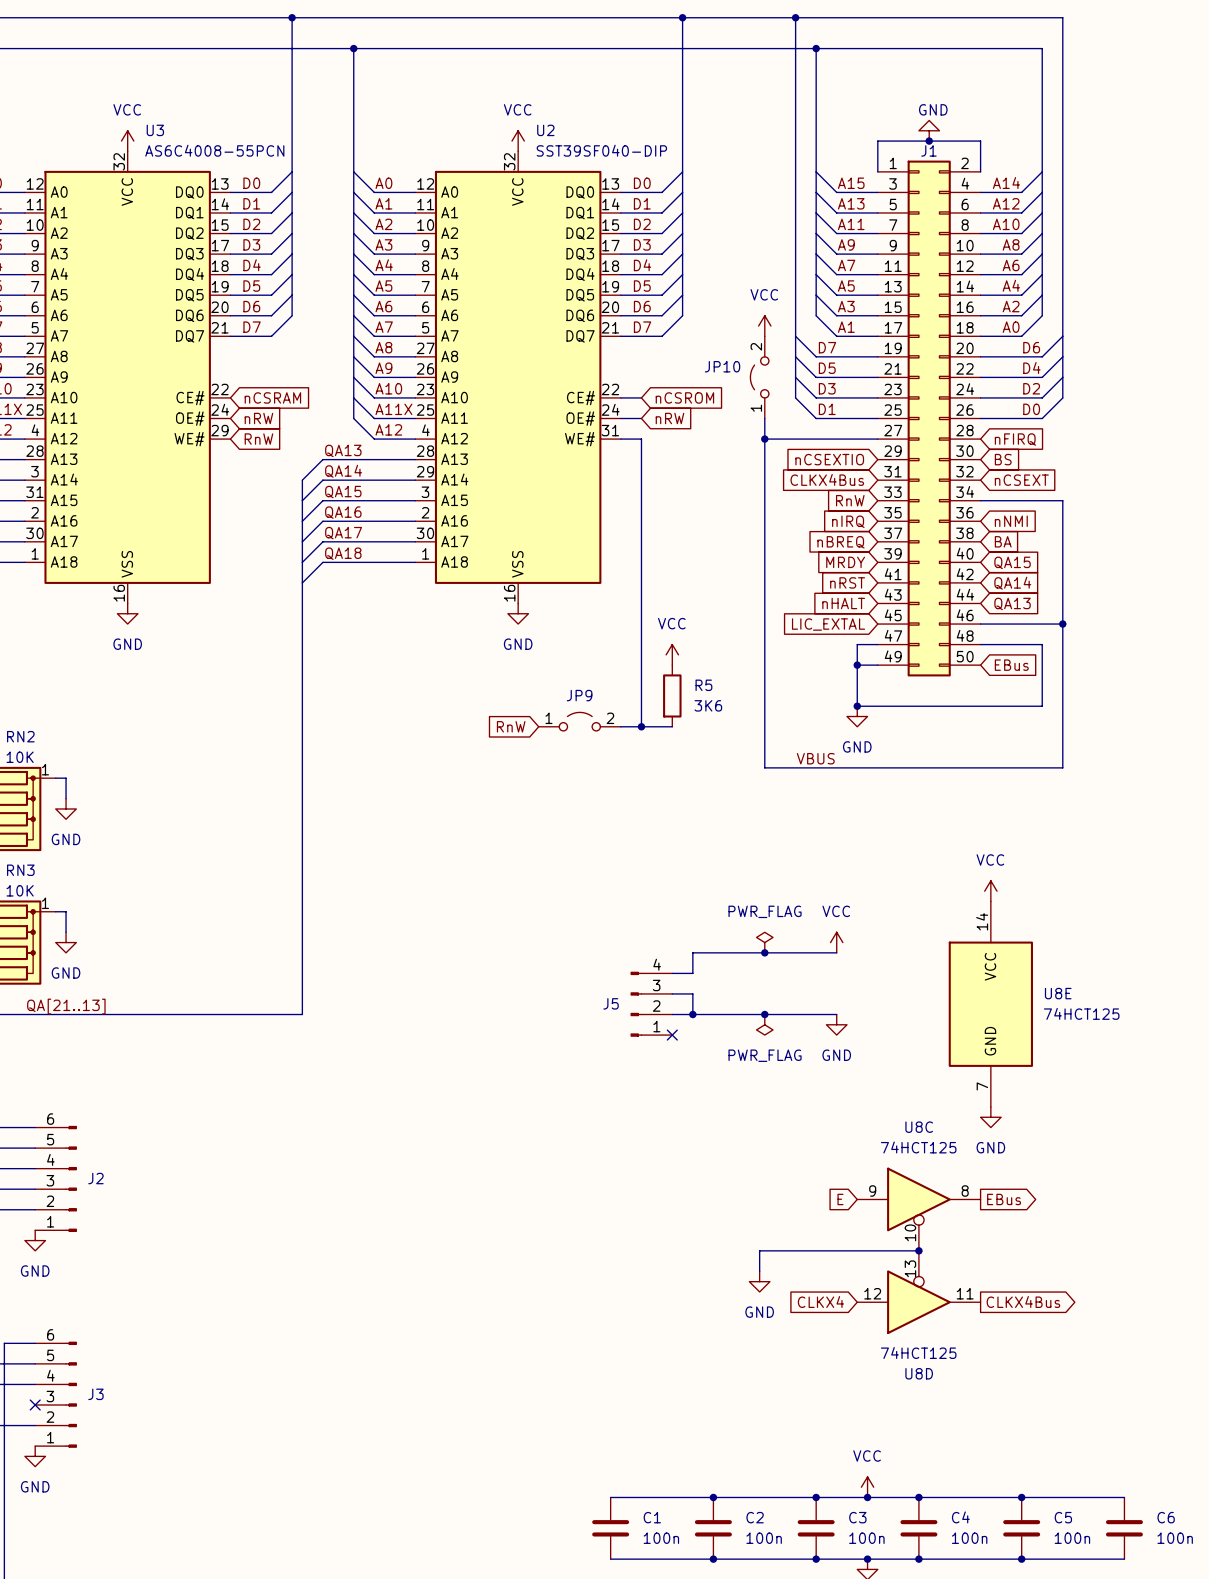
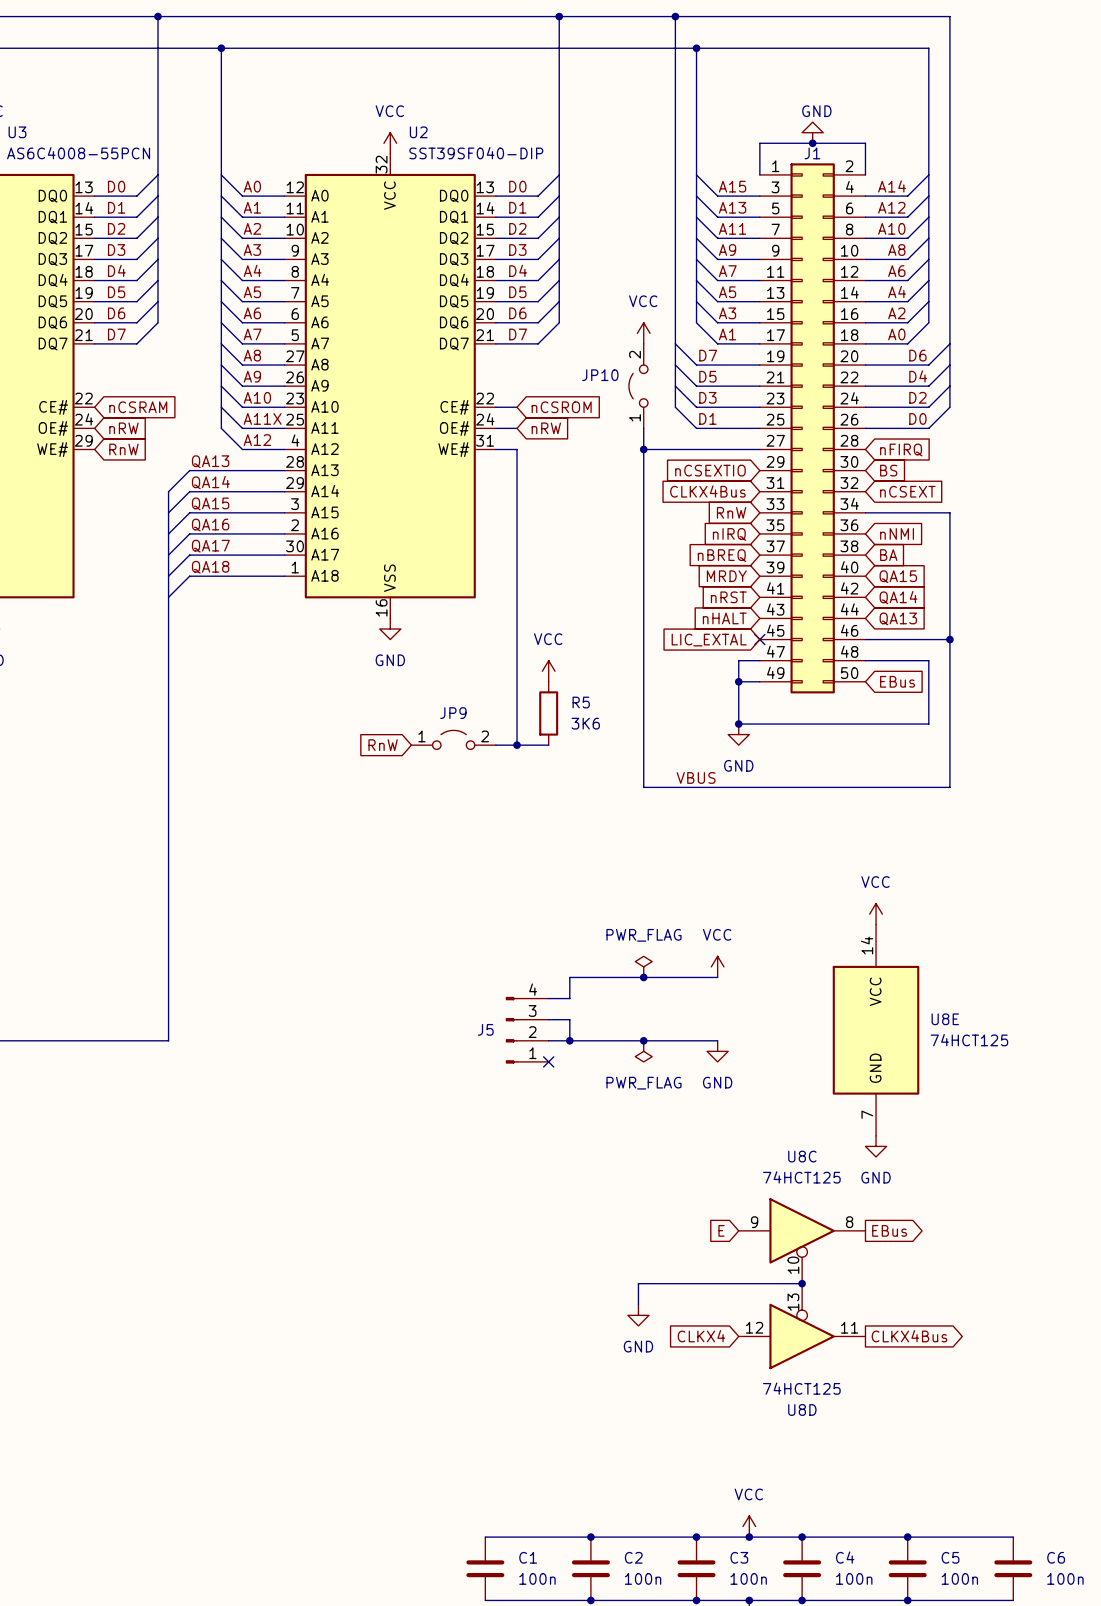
no-connect mark: none -> (759, 639)

